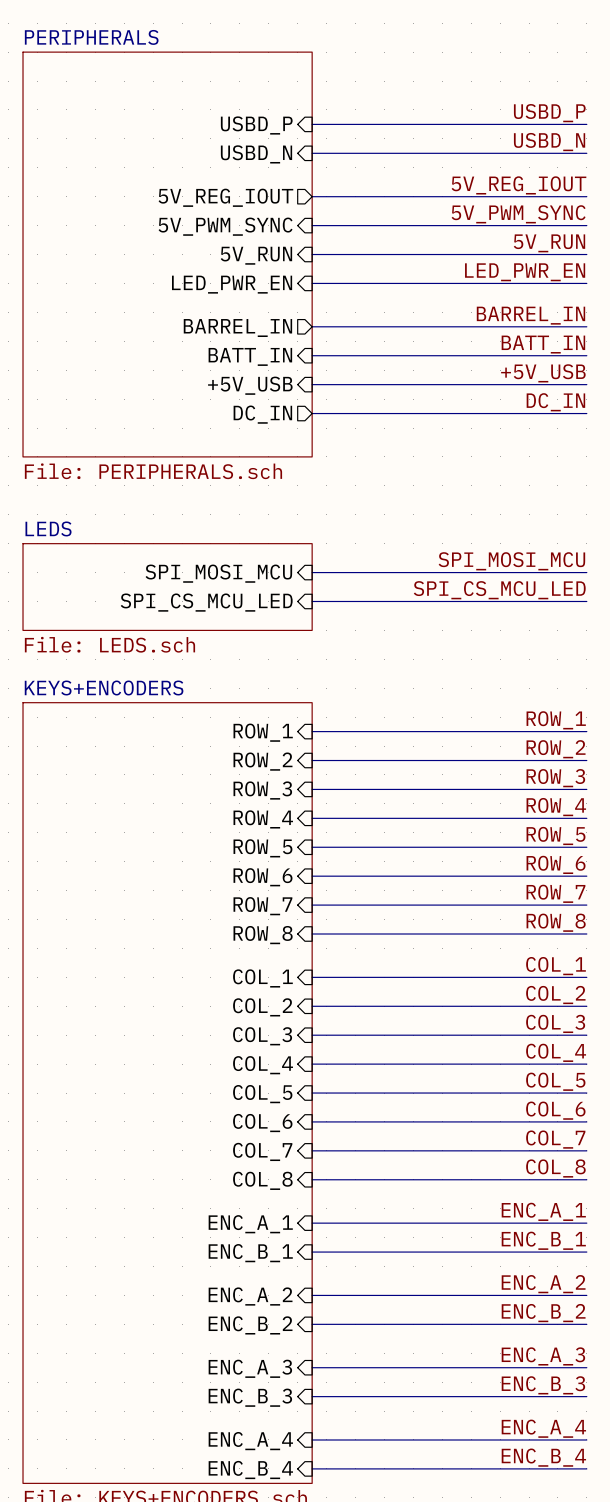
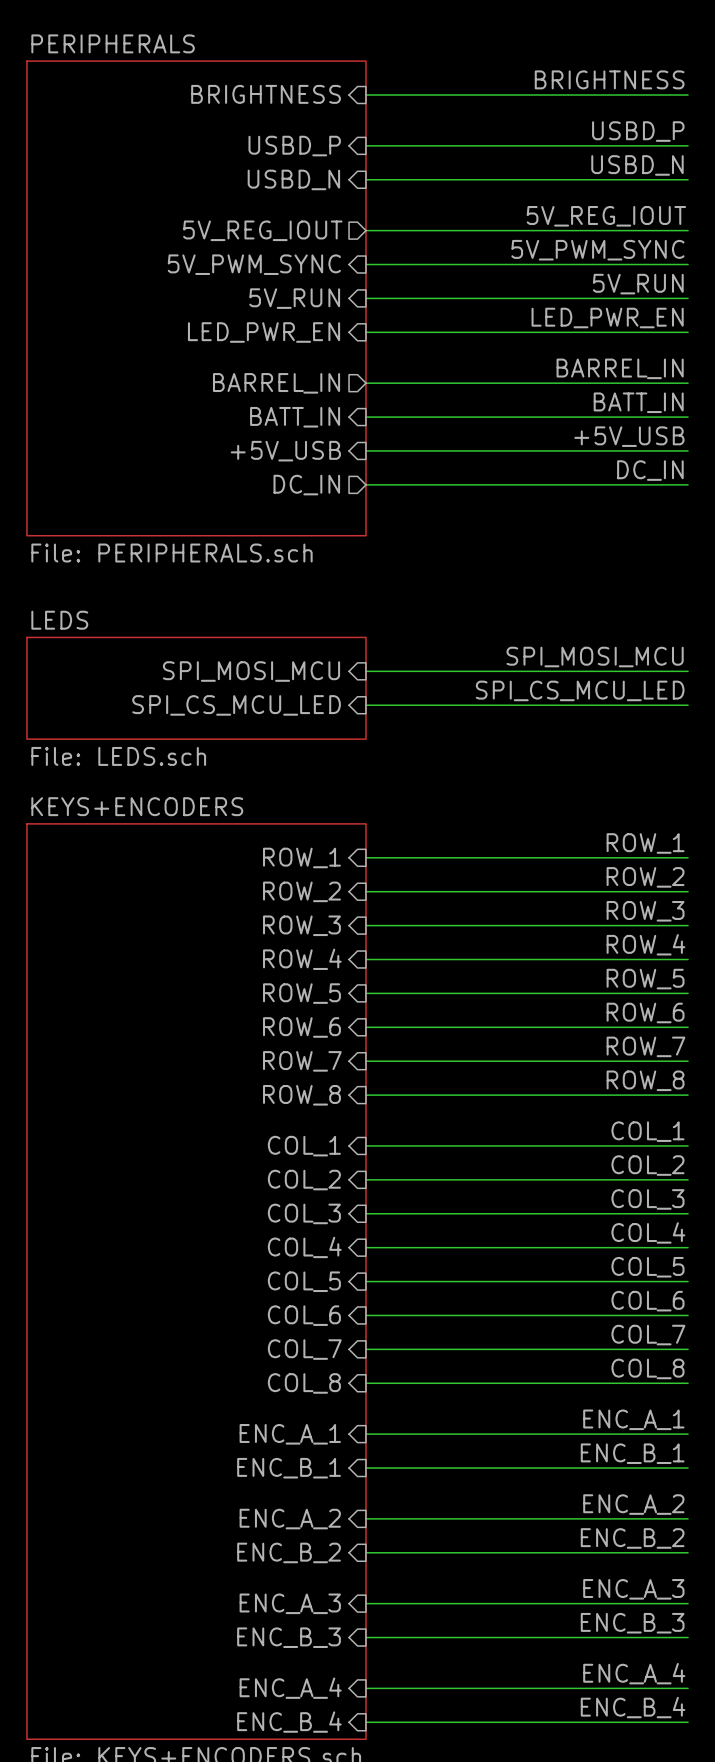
label: none -> BRIGHTNESS (609, 79)
sheet pin: none -> BRIGHTNESS (266, 94)
wire: none -> (365, 95) (688, 95)

